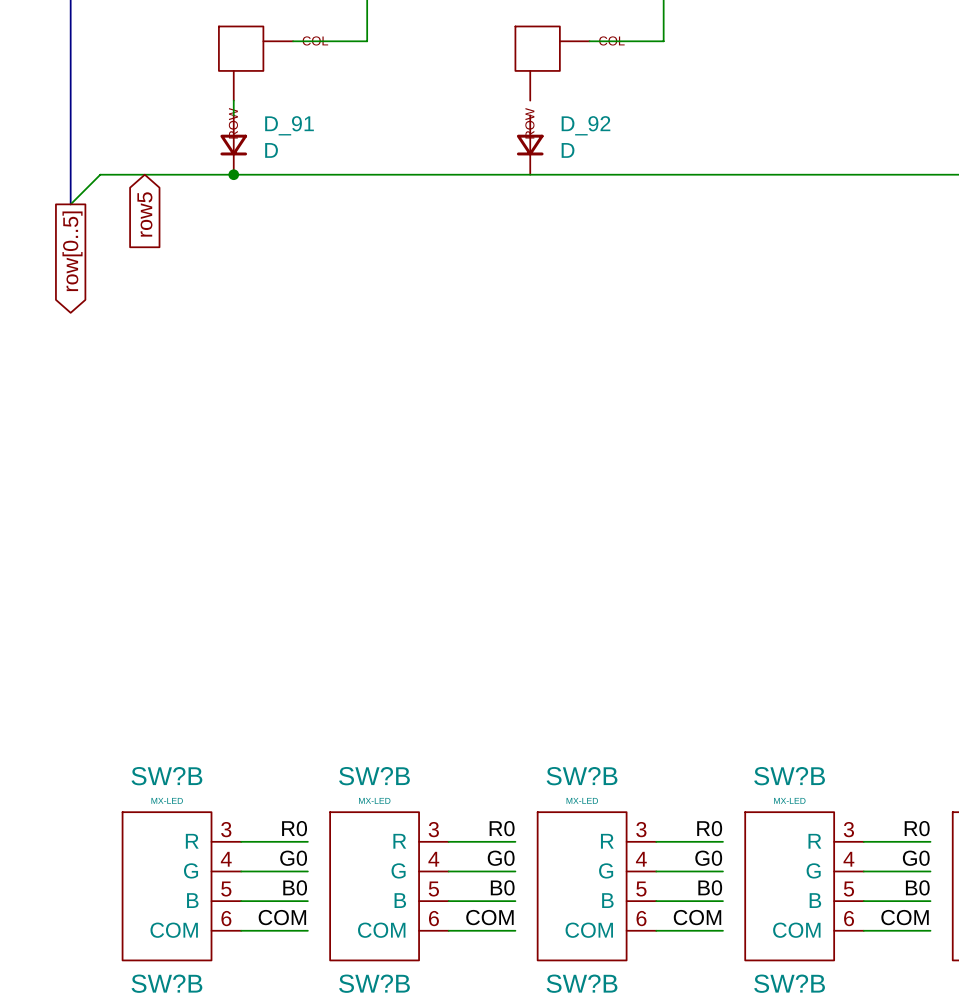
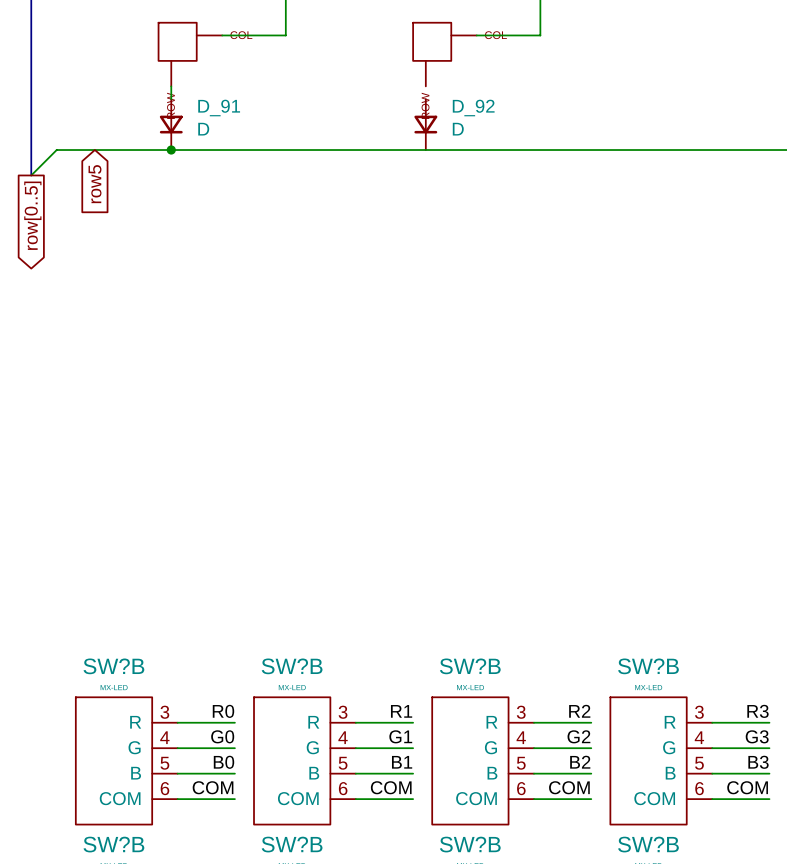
label: R0 (502, 828) -> R1 (401, 711)
label: R0 (709, 828) -> R2 (579, 711)
label: R0 (917, 828) -> R3 (757, 711)
label: G0 (501, 858) -> G1 (400, 736)
label: G0 (708, 858) -> G2 (578, 736)
label: G0 (916, 858) -> G3 (757, 736)
label: B0 (502, 887) -> B1 (402, 762)
label: B0 (710, 887) -> B2 (580, 762)
label: B0 (917, 887) -> B3 (758, 762)

